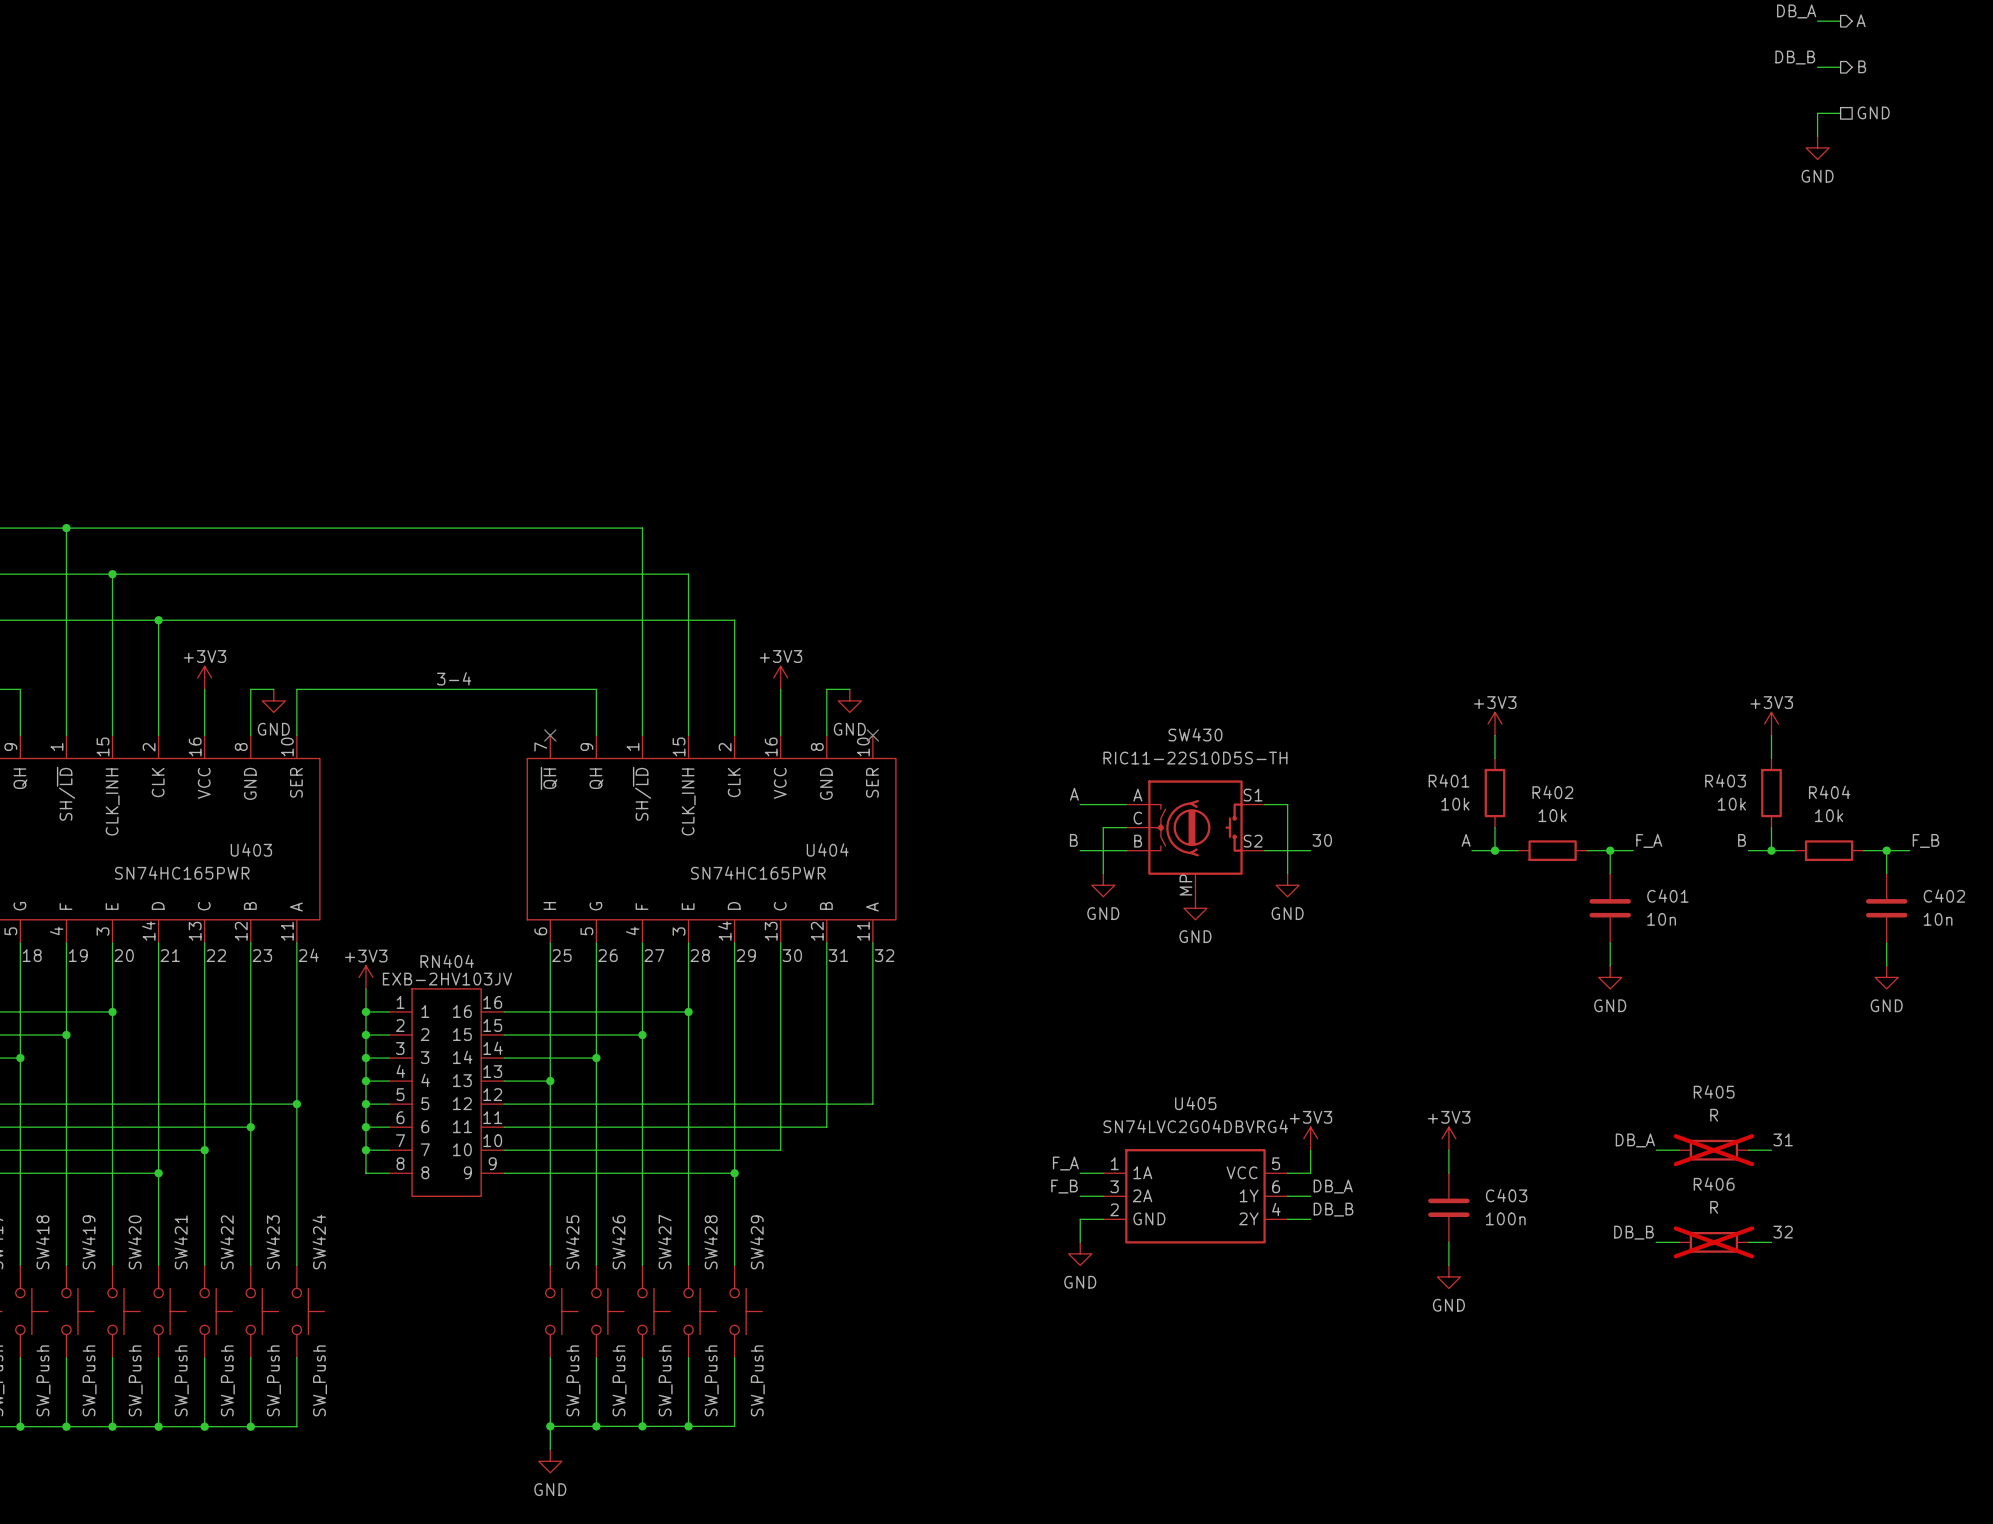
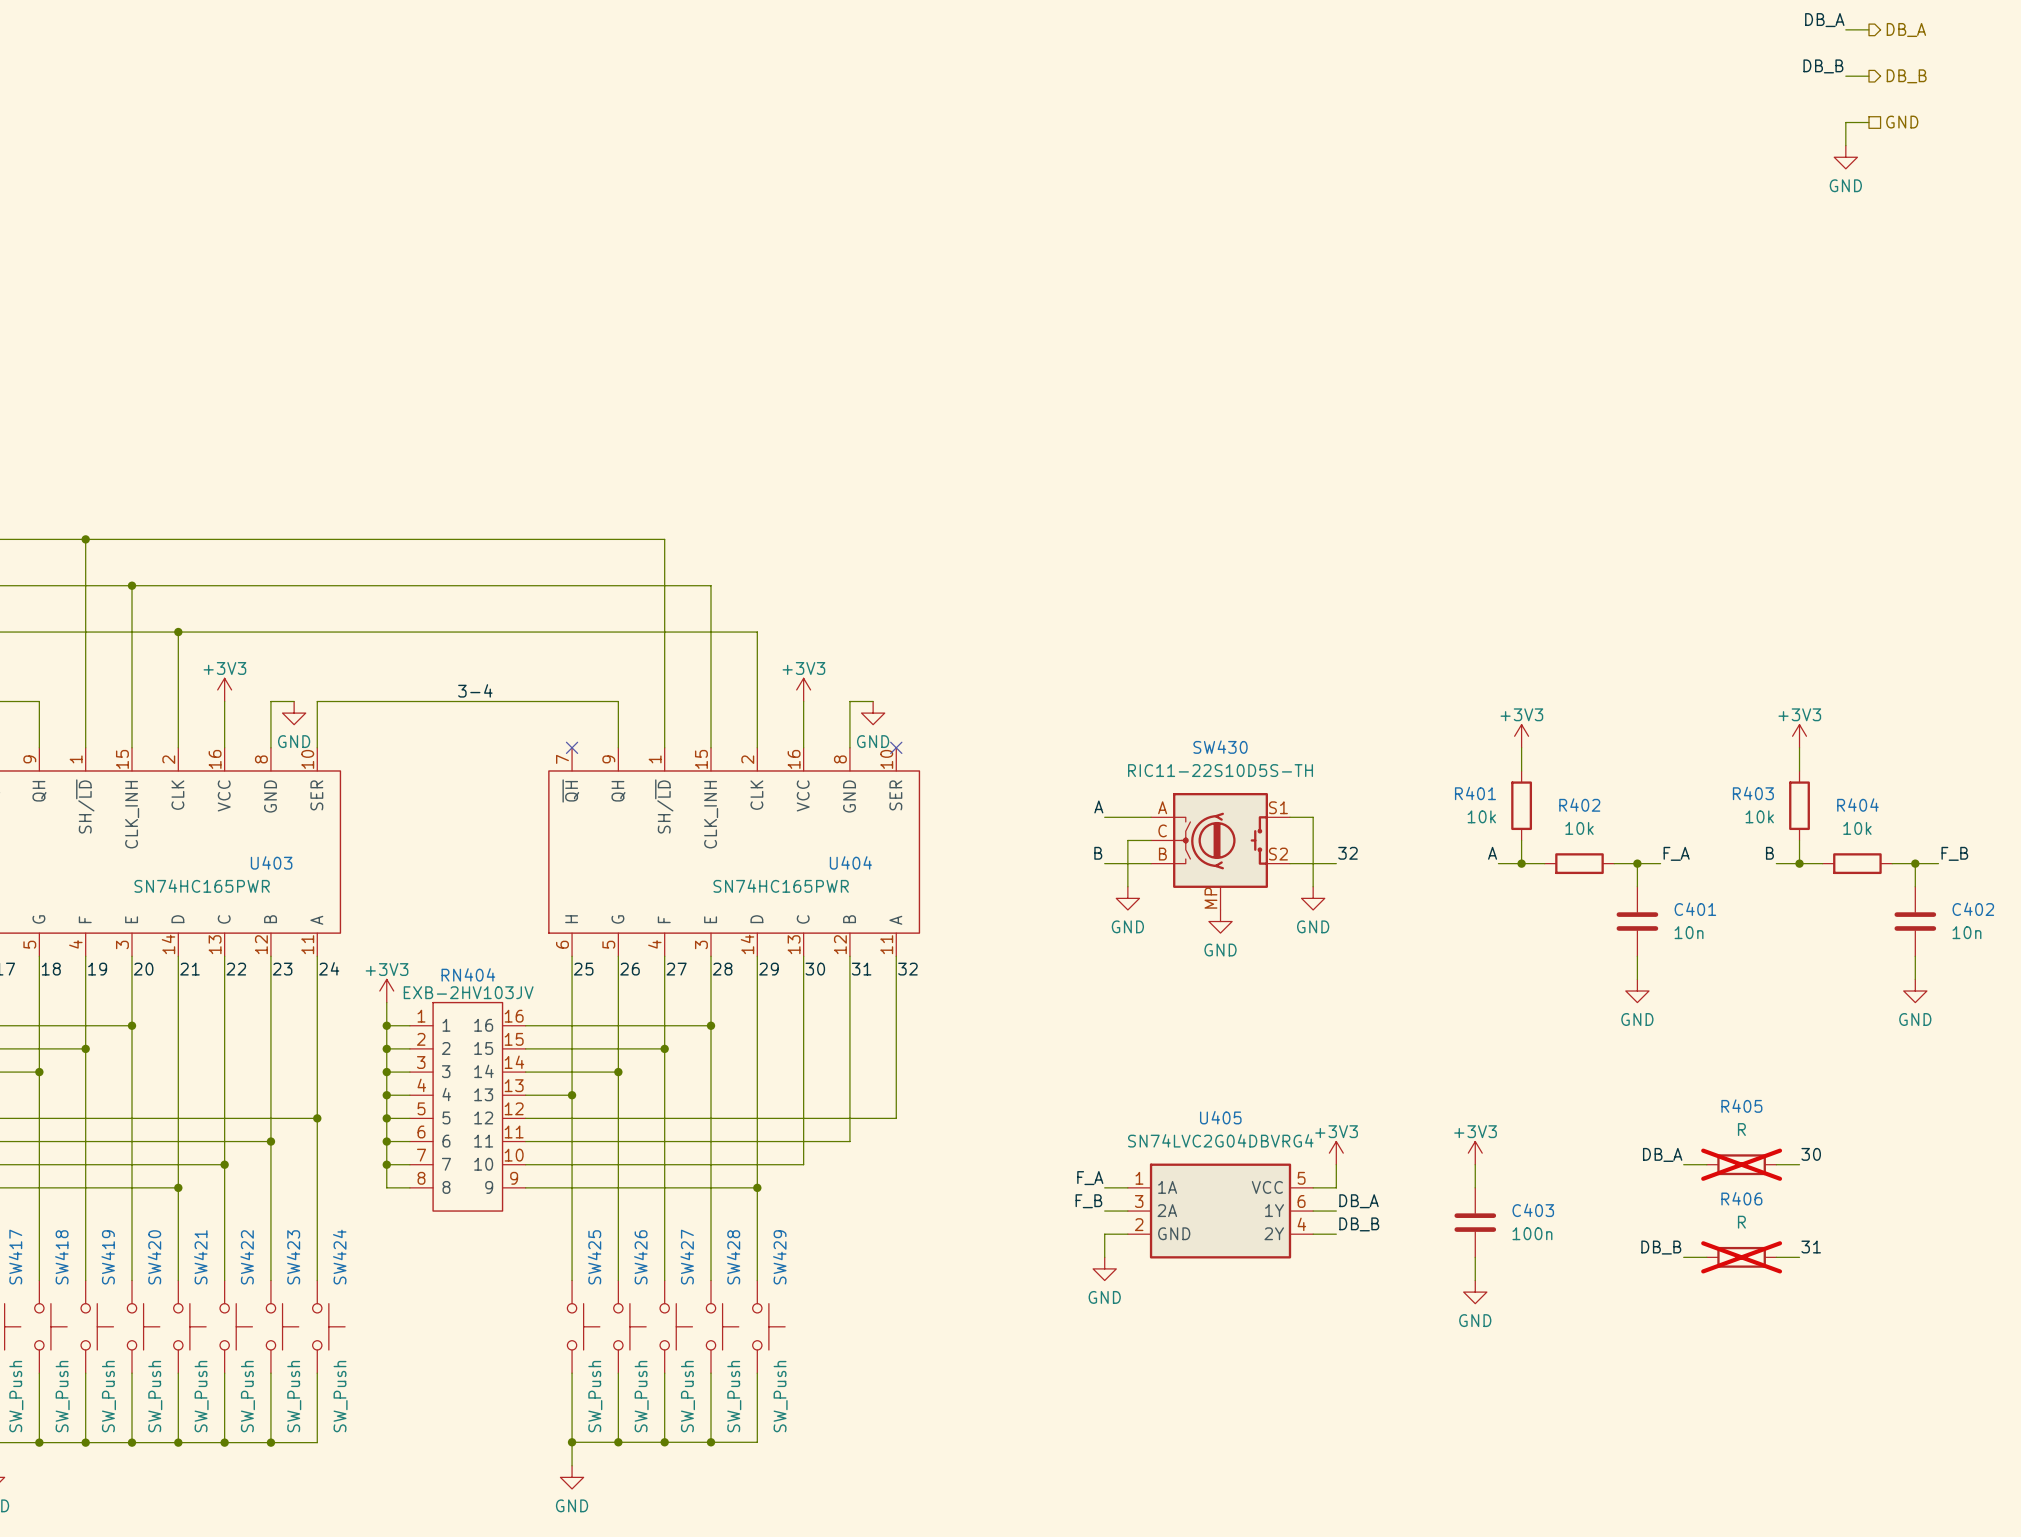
hierarchical label: A (1861, 20) -> DB_A (1906, 29)
hierarchical label: B (1862, 66) -> DB_B (1906, 76)
label: 30 (1322, 840) -> 32 (1347, 853)
label: 31 (1783, 1139) -> 30 (1811, 1154)
label: 32 (1783, 1232) -> 31 (1811, 1247)

